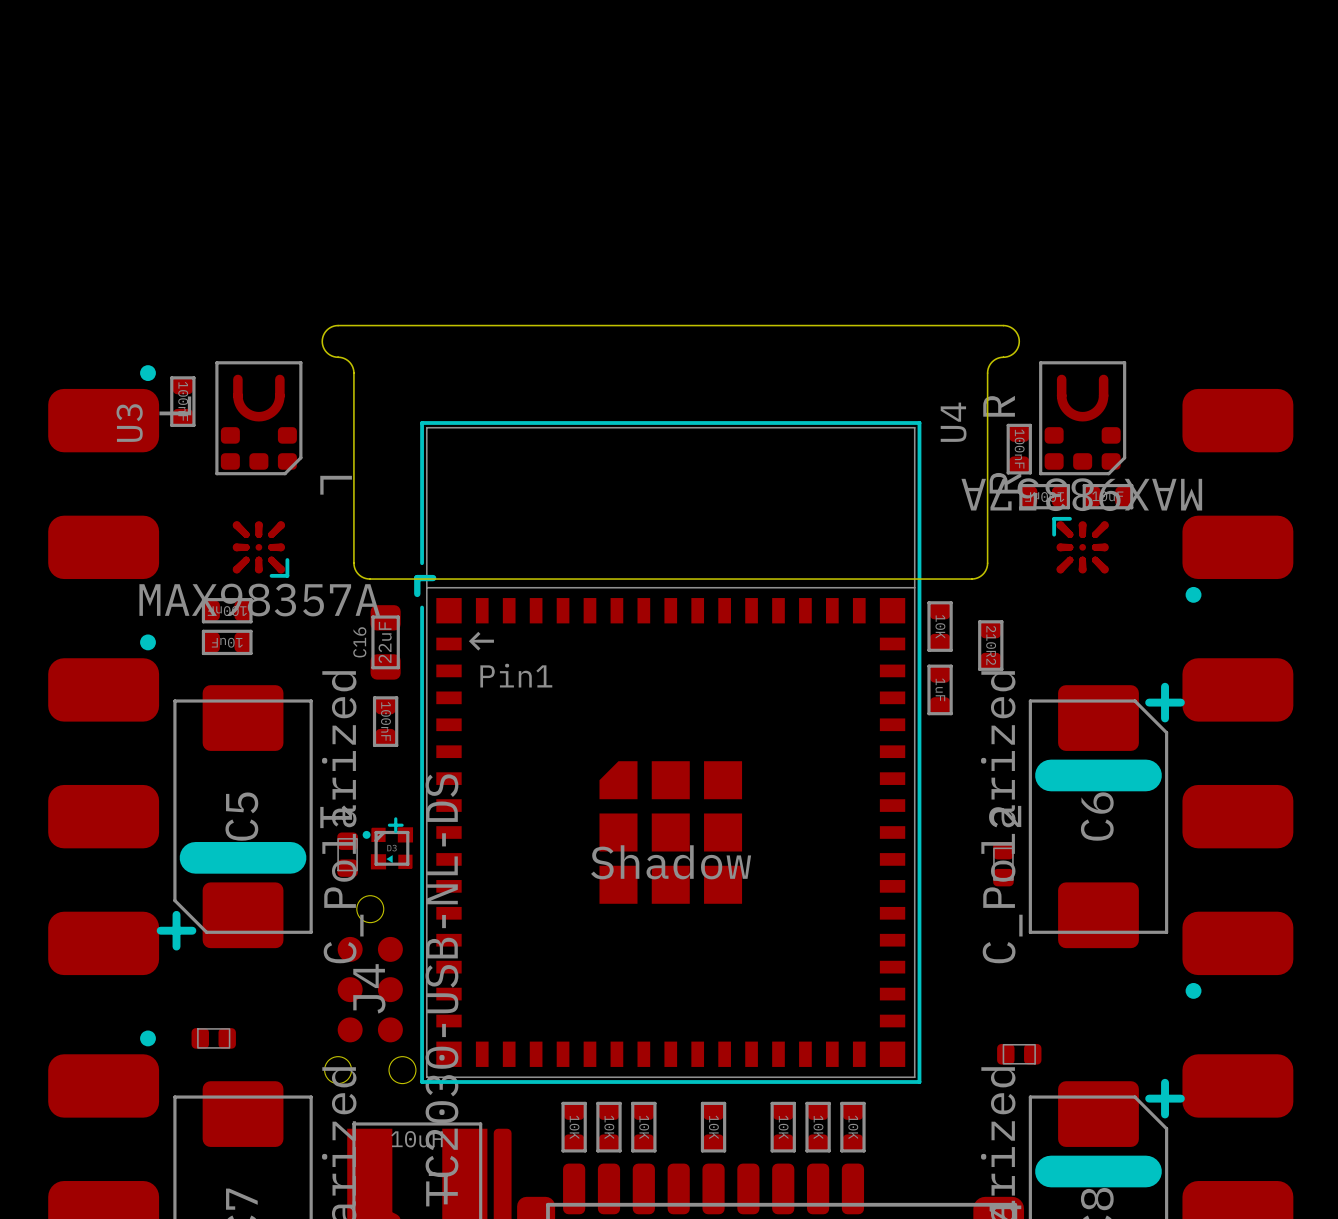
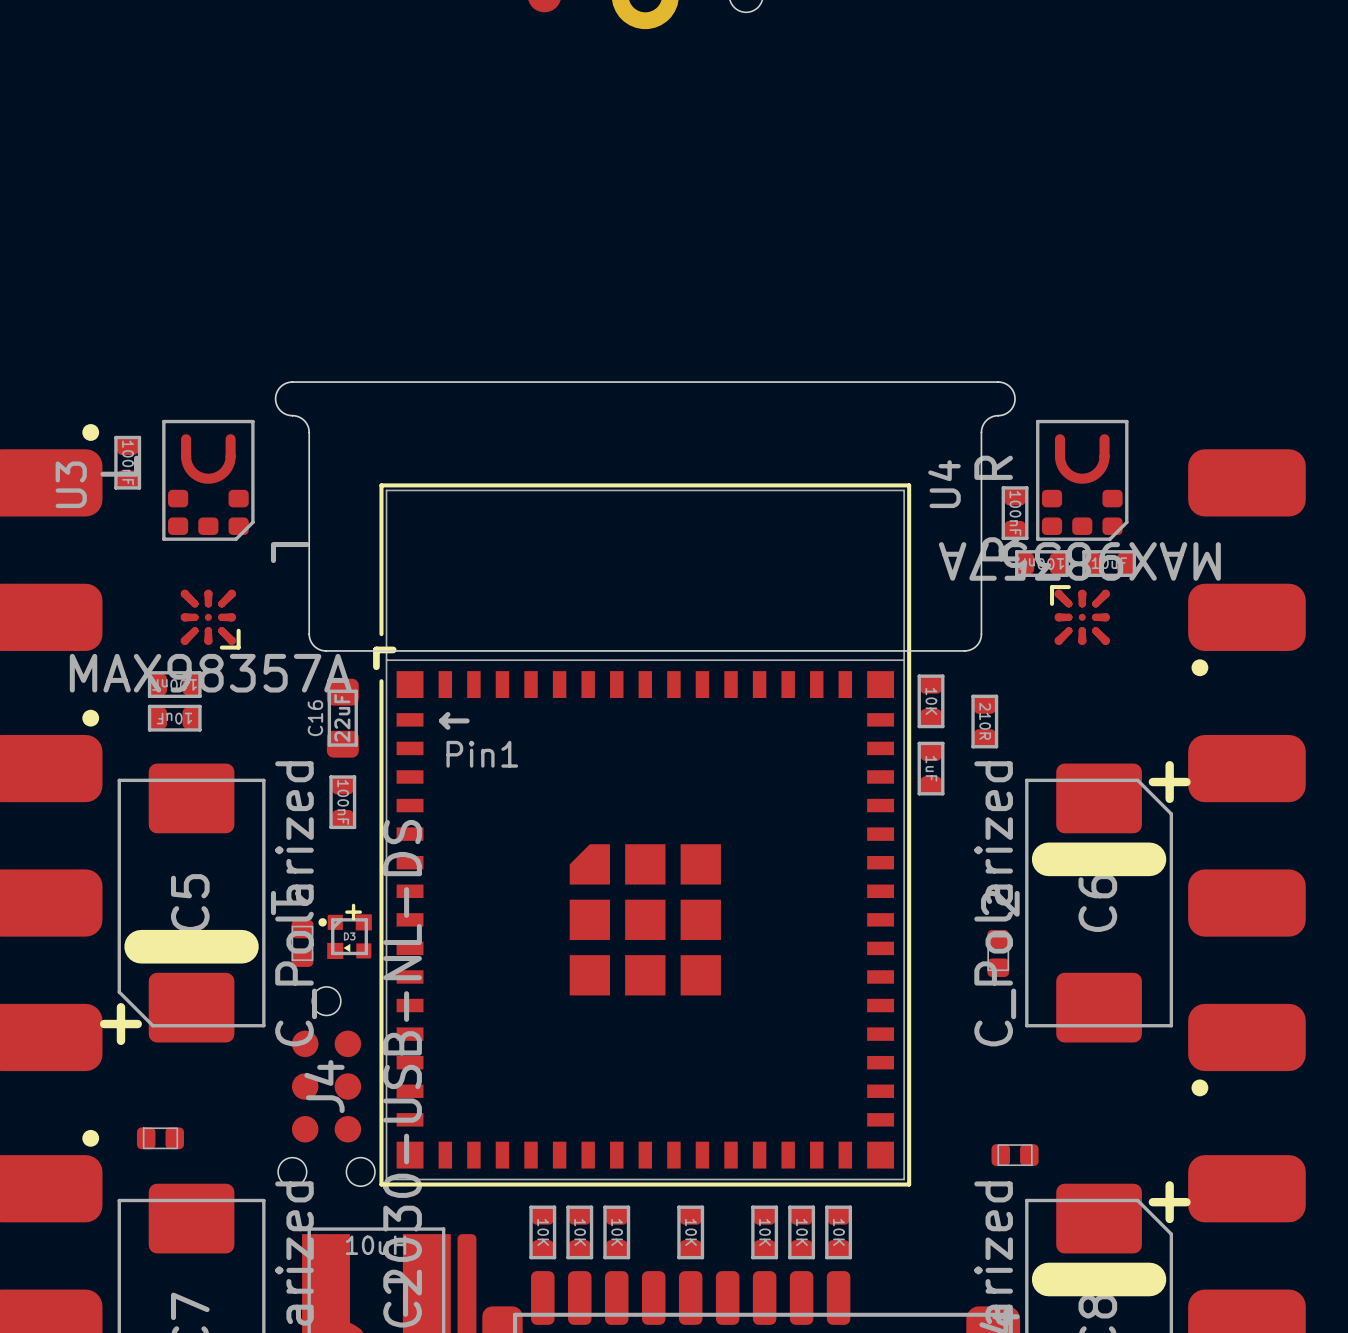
part value: 210R2 (991, 645) -> 210R (985, 721)
drawing: [591, 845, 752, 880] -> none

